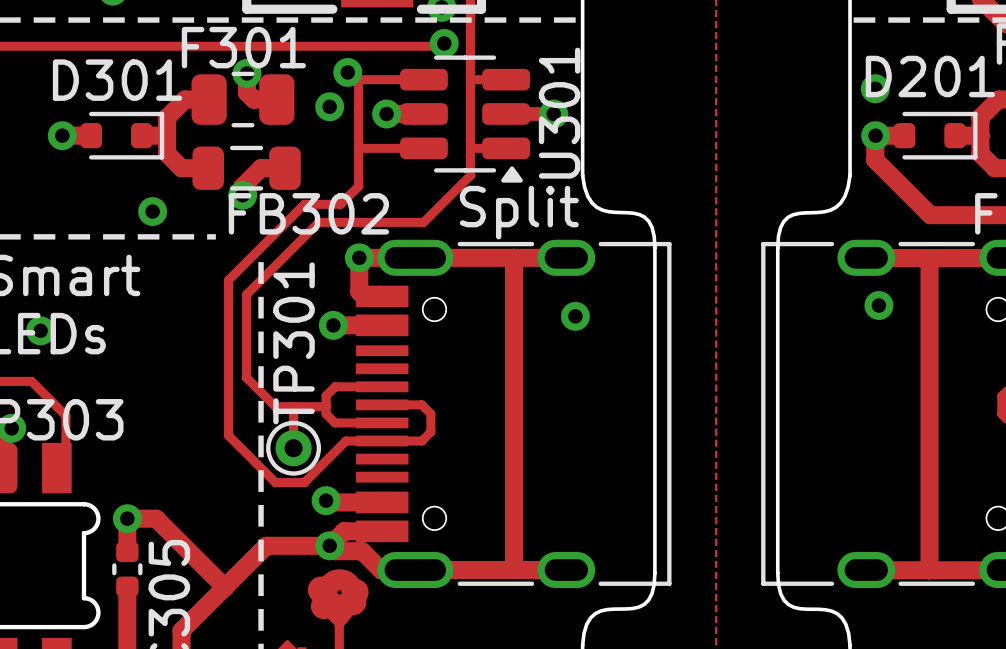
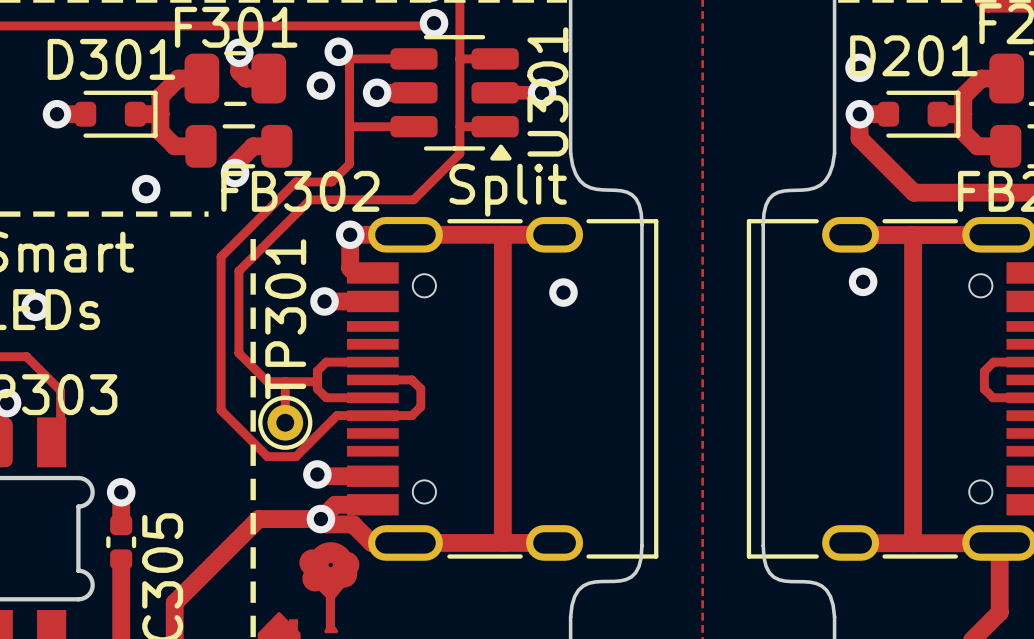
track: (127, 518) (156, 518) (224, 587) -> none

